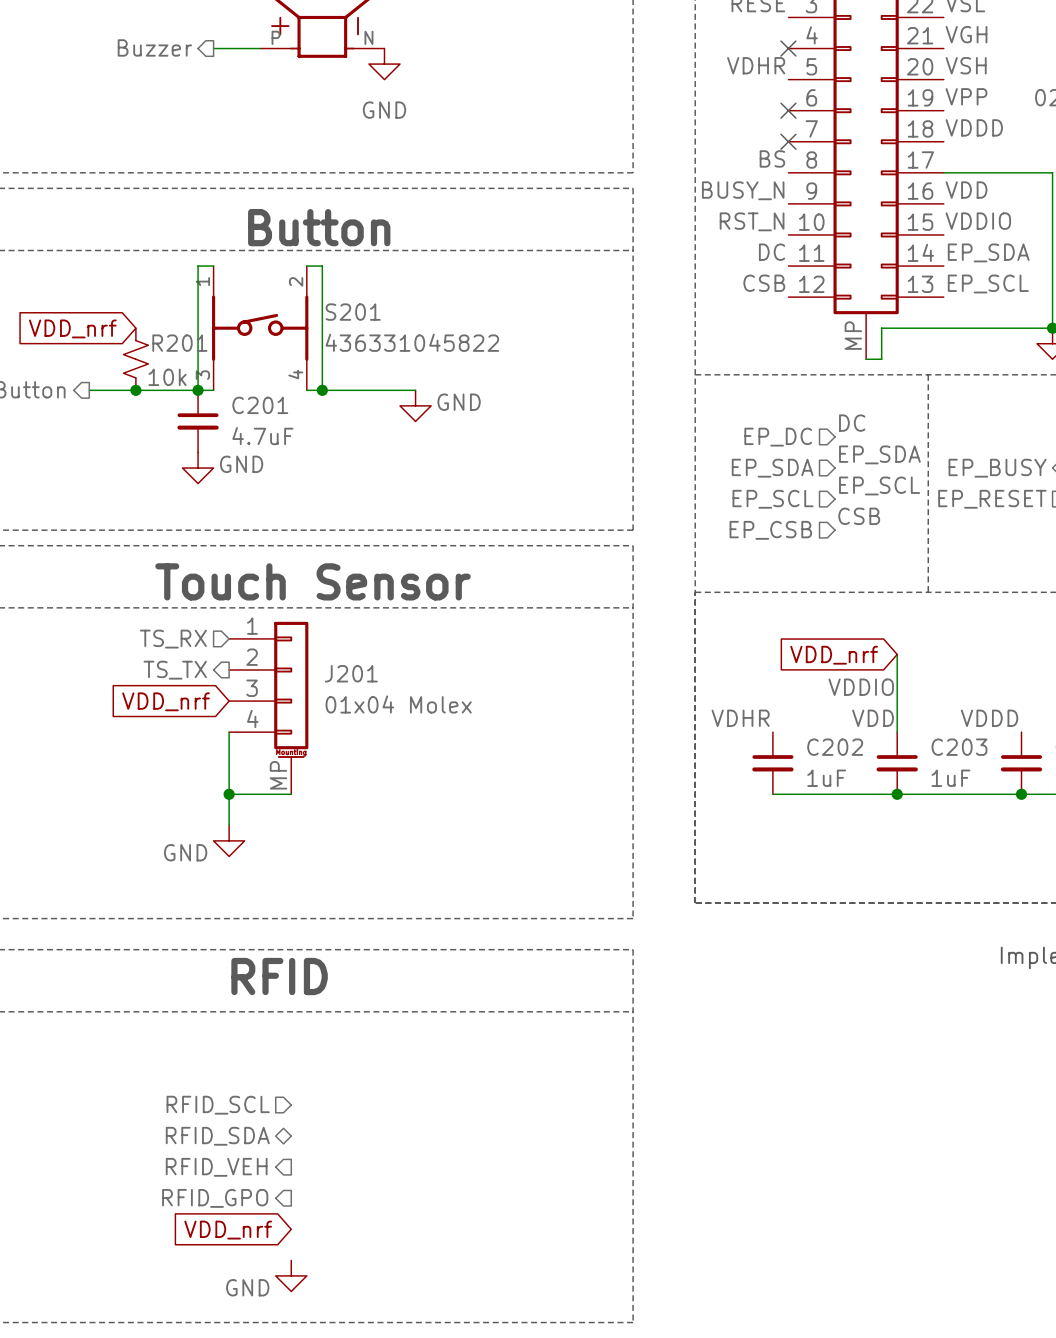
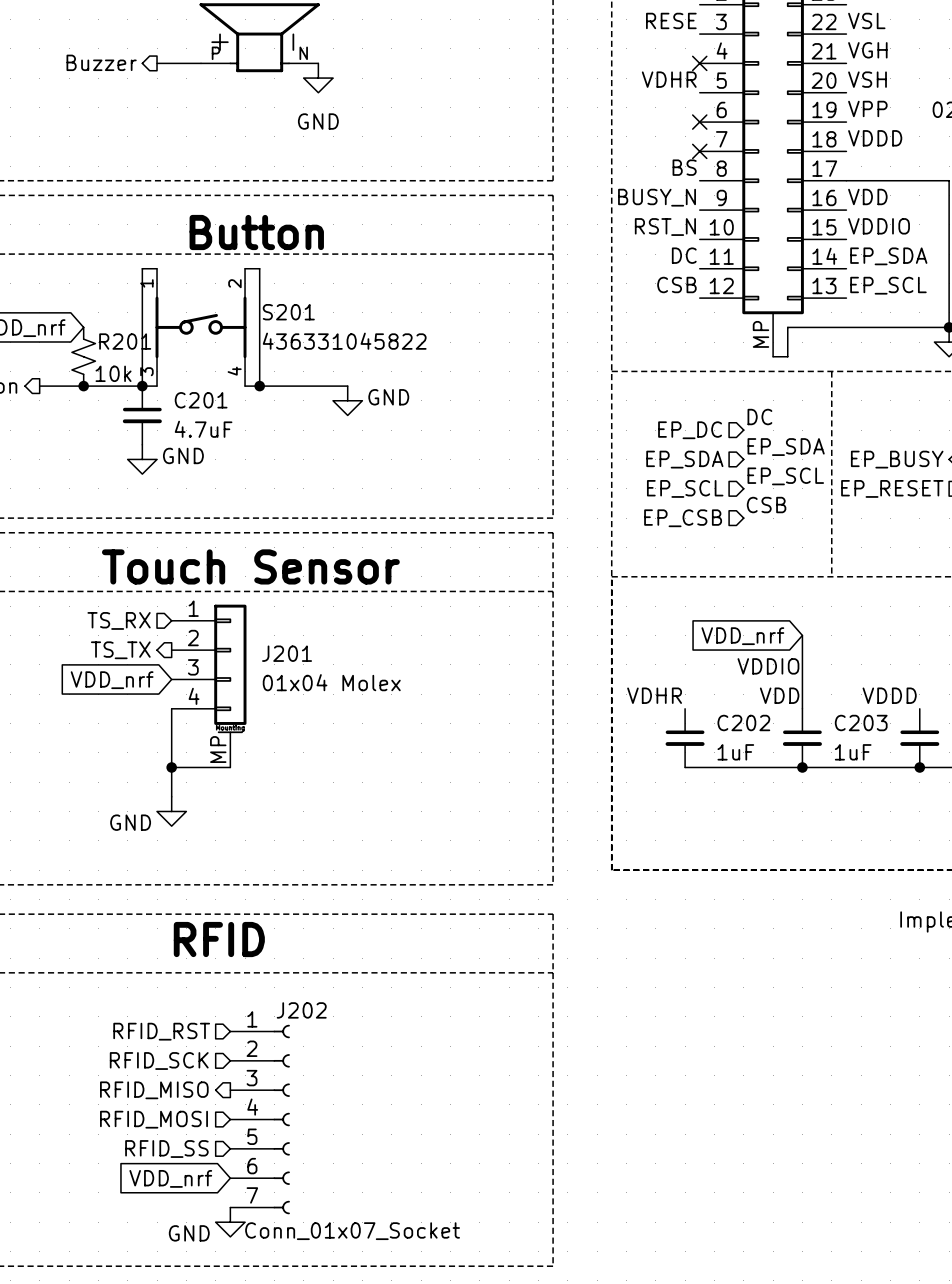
hierarchical label: none -> RFID_RST (161, 1031)
hierarchical label: RFID_SCL (218, 1105) -> RFID_SCK (159, 1061)
hierarchical label shape: bidirectional (217, 1136) -> output (154, 1090)
hierarchical label: RFID_SDA (217, 1136) -> RFID_MISO (154, 1090)
hierarchical label shape: output (216, 1167) -> input (153, 1119)
hierarchical label: RFID_VEH (216, 1167) -> RFID_MOSI (153, 1119)
J202: none -> Conn_01x07_Socket (260, 1119)
hierarchical label shape: output (215, 1198) -> input (166, 1149)
hierarchical label: RFID_GPO (215, 1198) -> RFID_SS (166, 1149)

